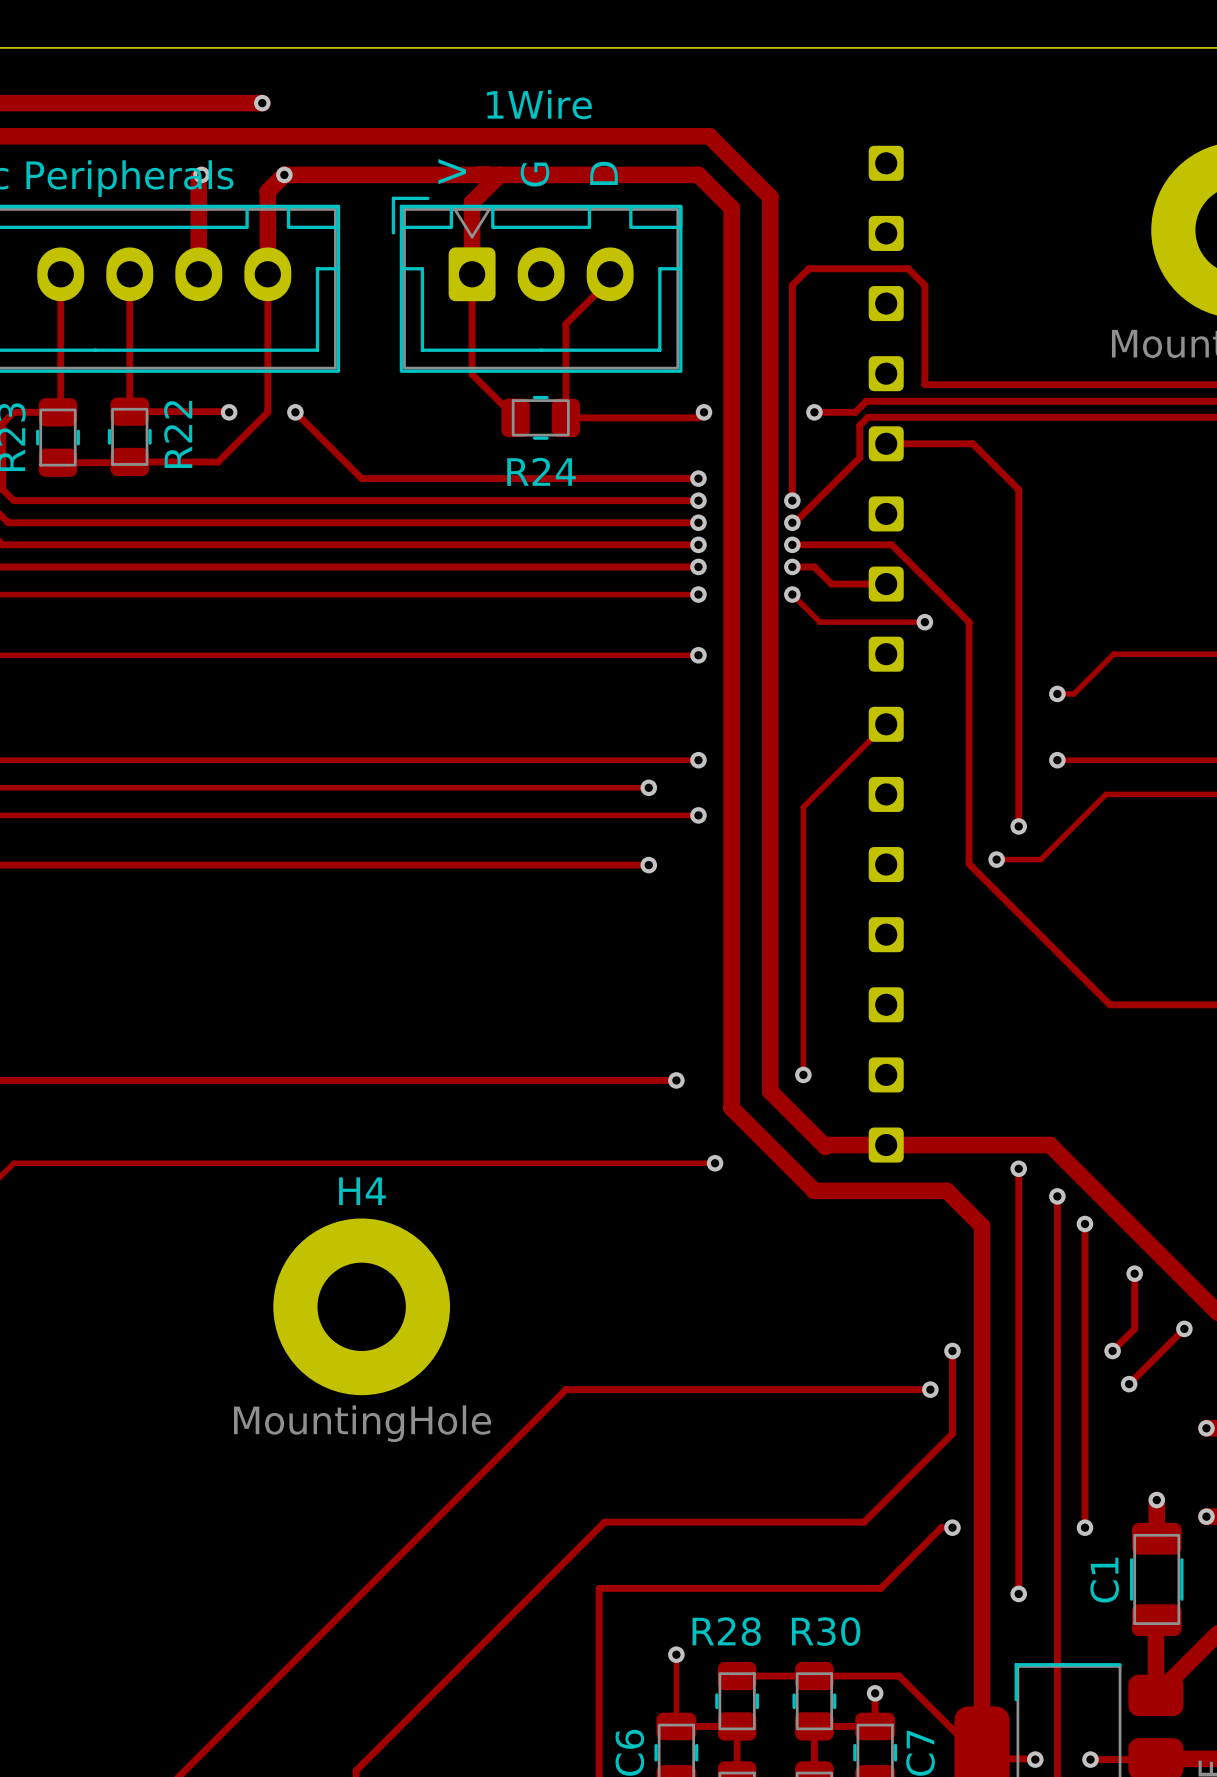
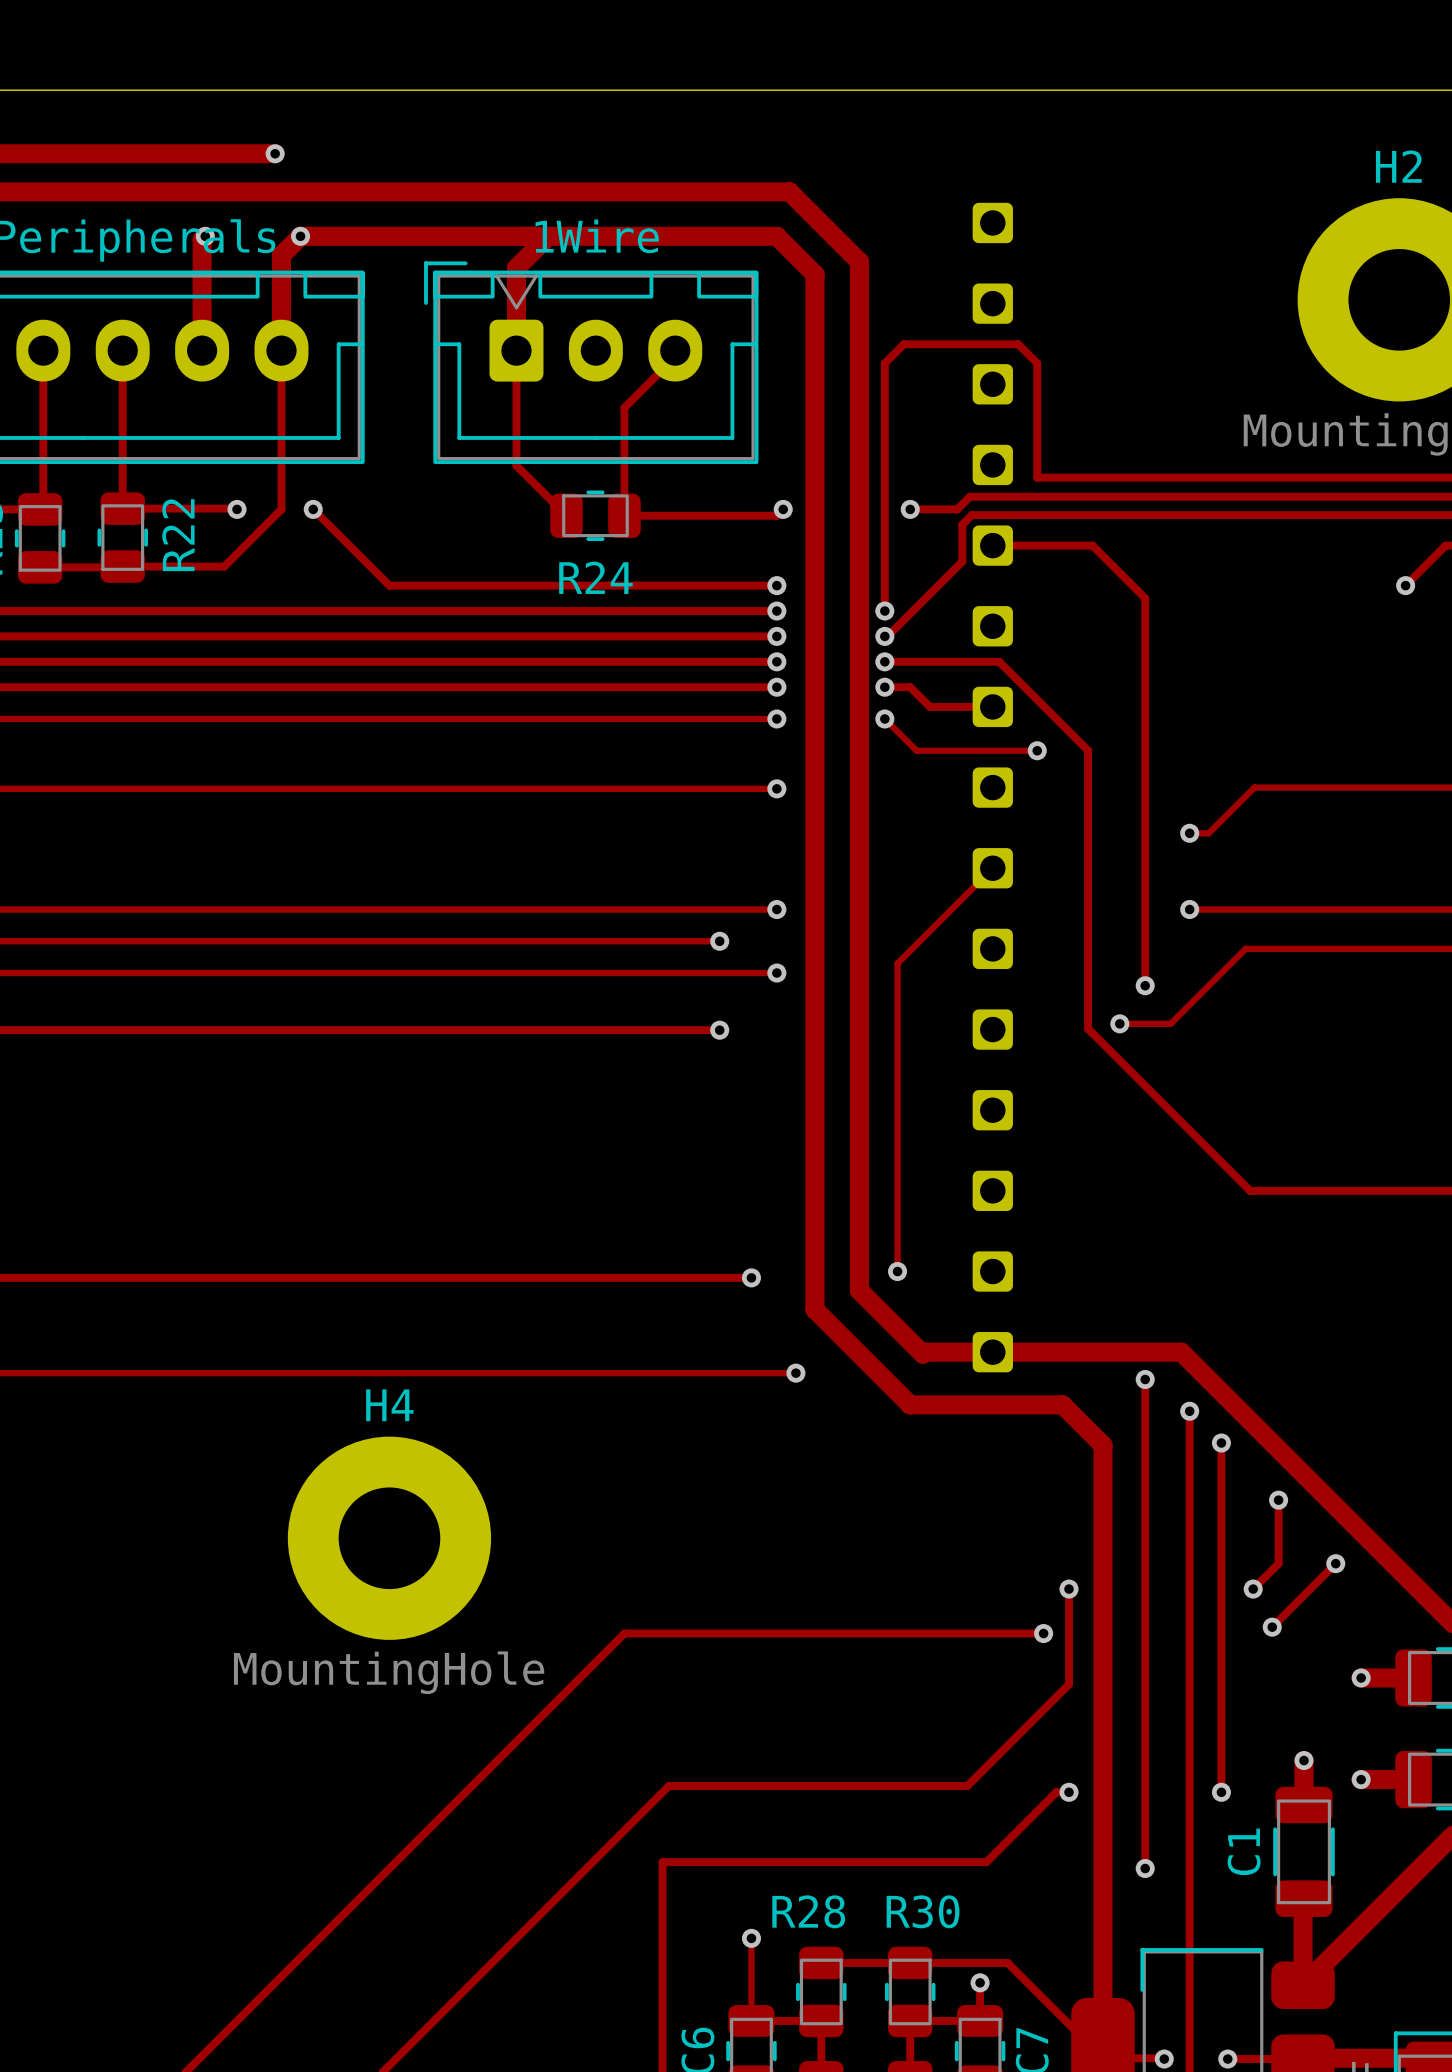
1Wire name position: 1Wire (539, 104) -> 1Wire (597, 236)
text: V (452, 171) -> none
text: D (604, 173) -> none
text: G (535, 174) -> none

